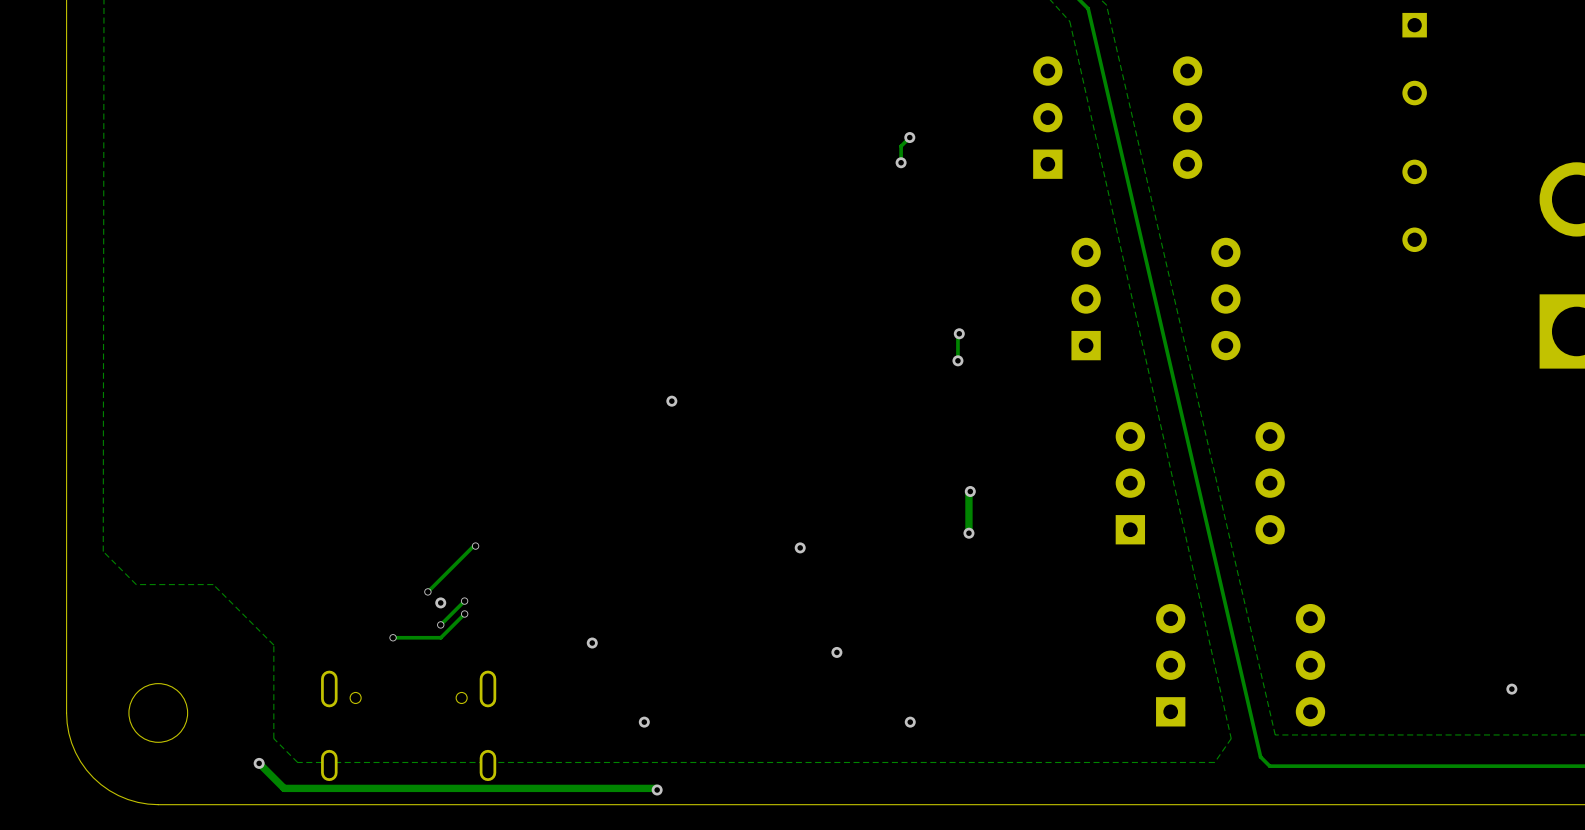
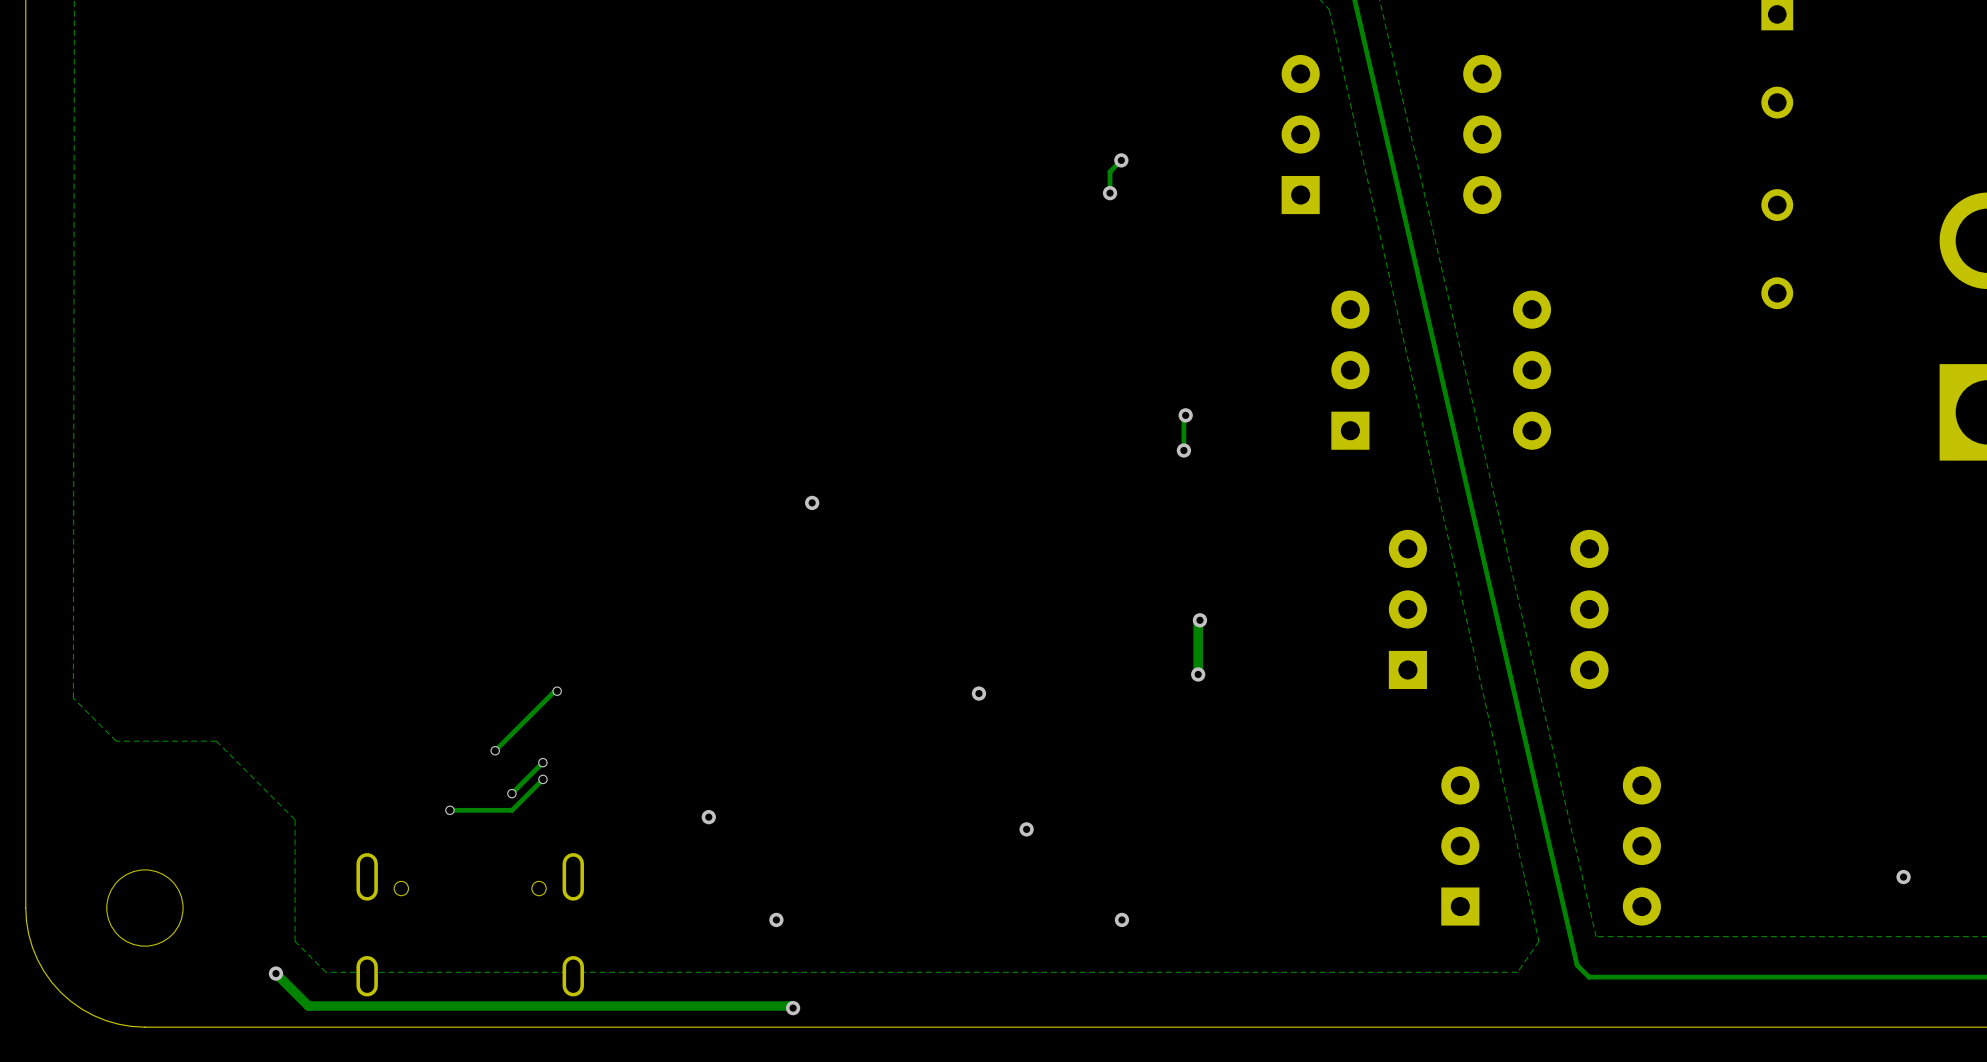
via: (440, 602) -> none

